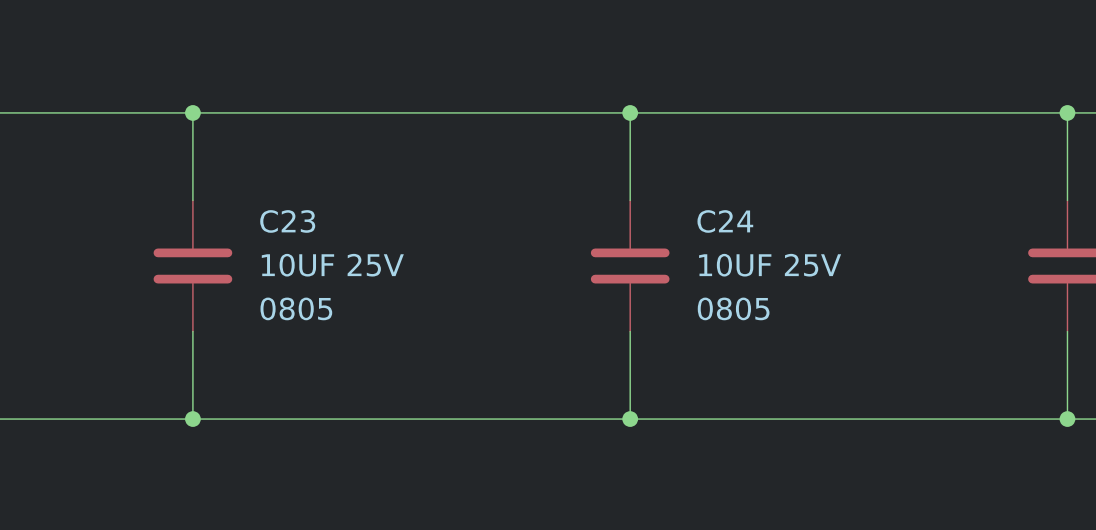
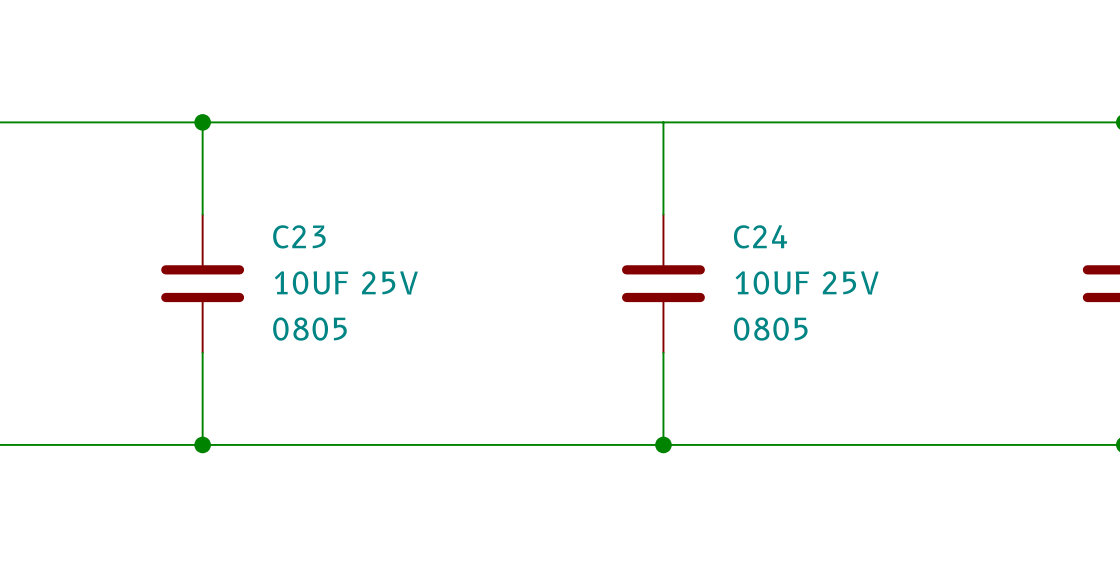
junction: (630, 112) -> none

